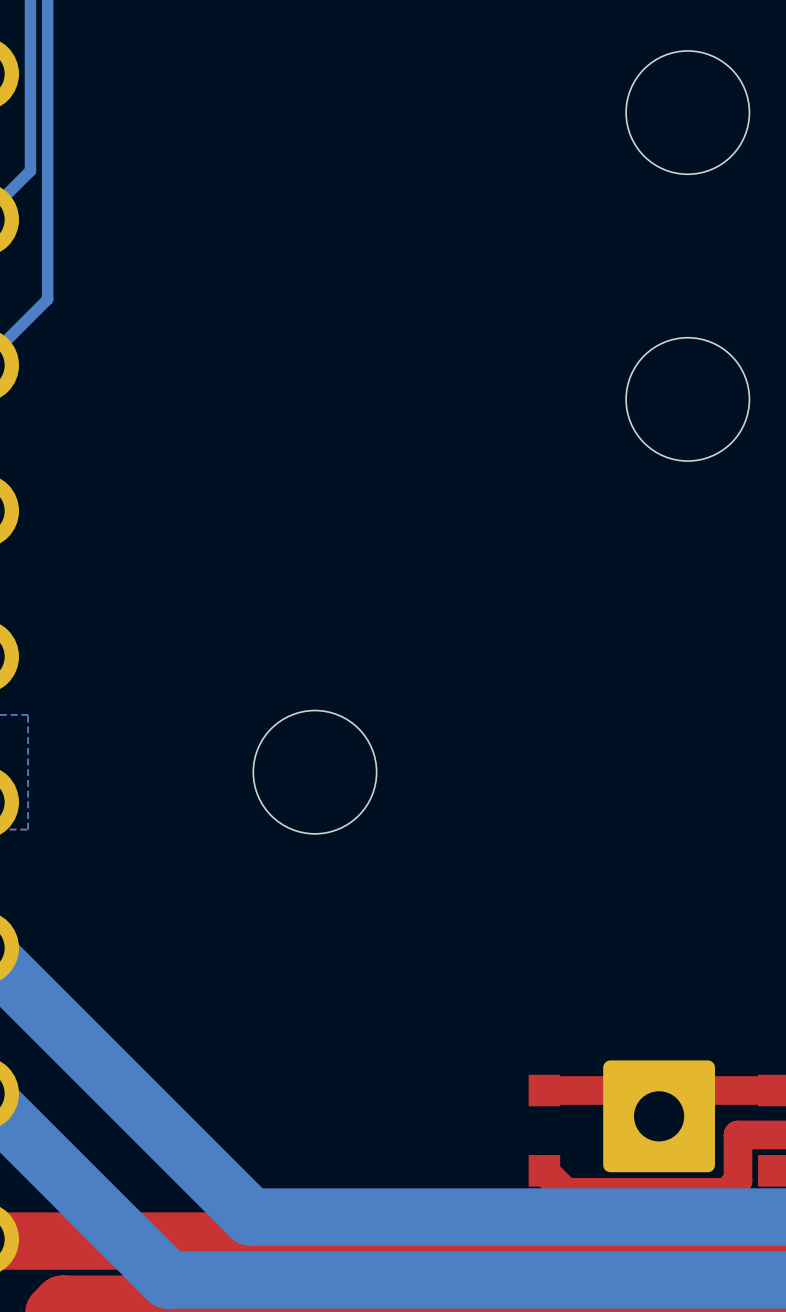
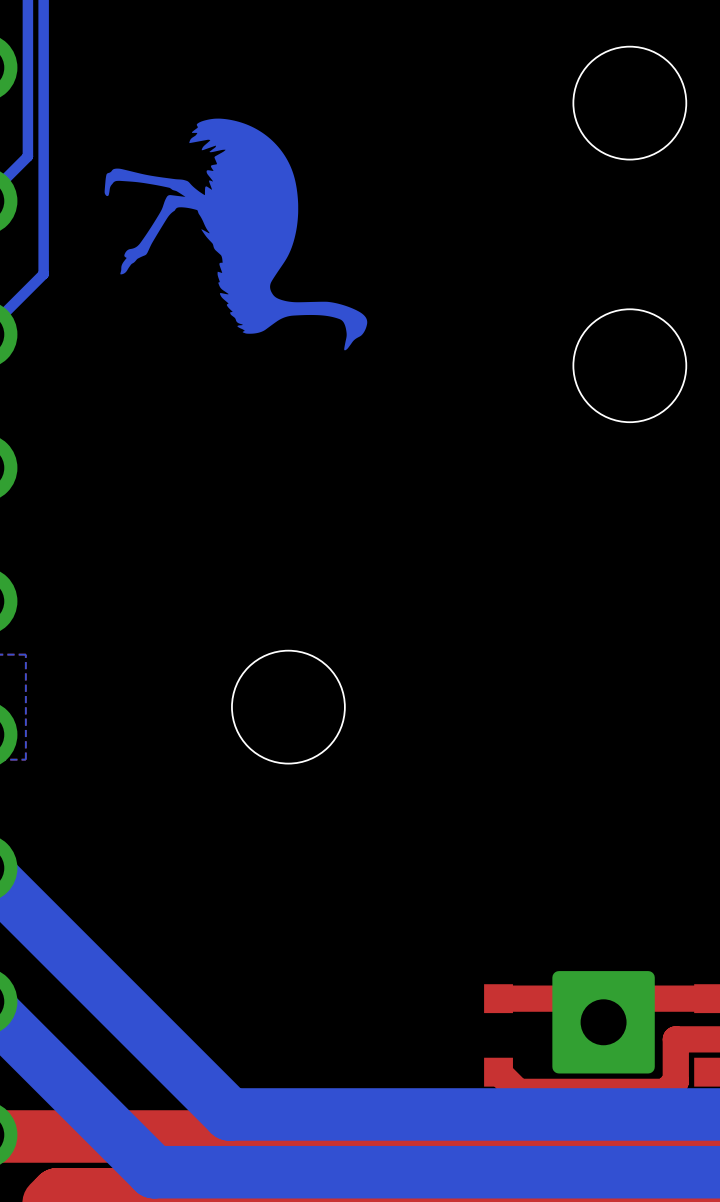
drawing: none -> [104, 118, 368, 351]

